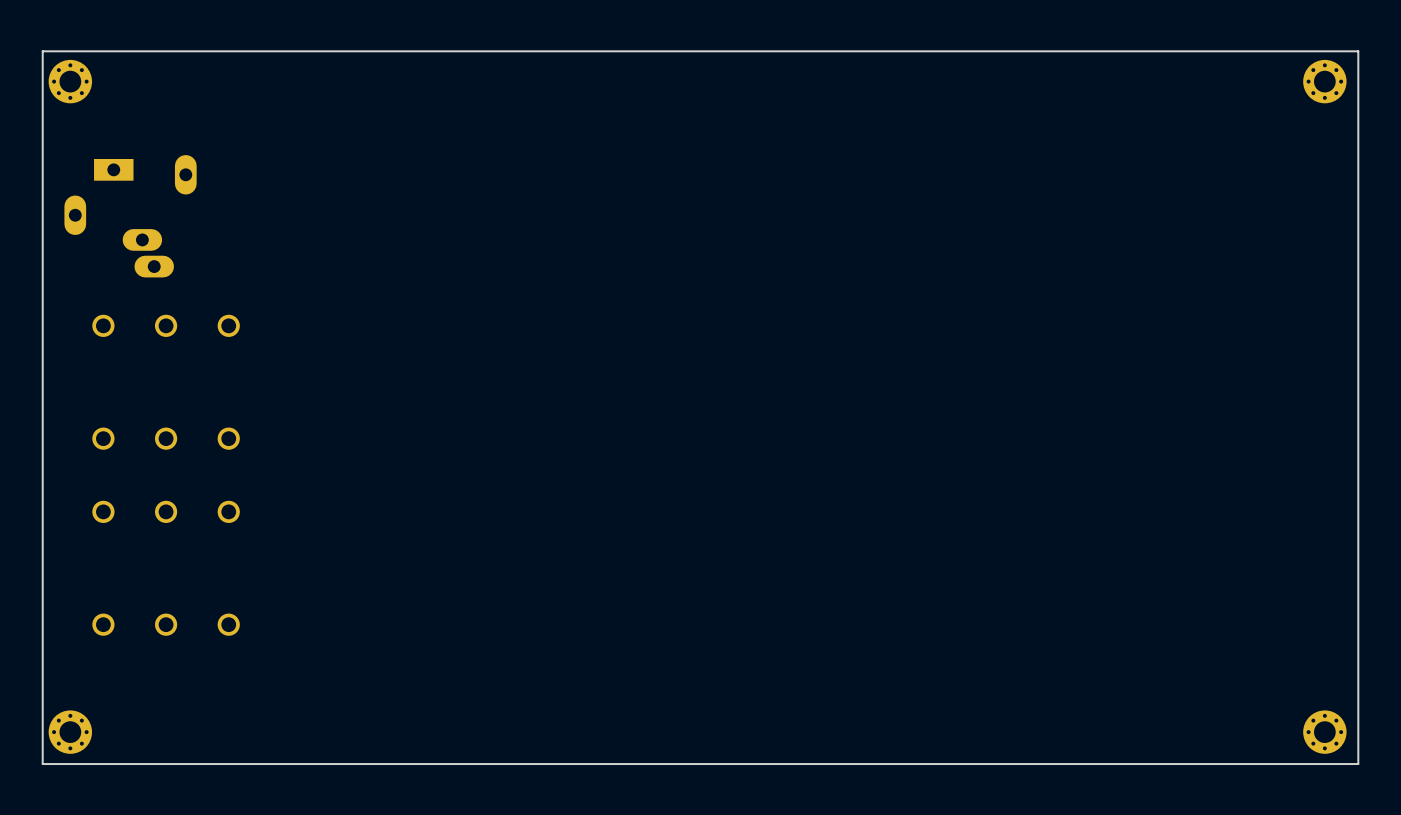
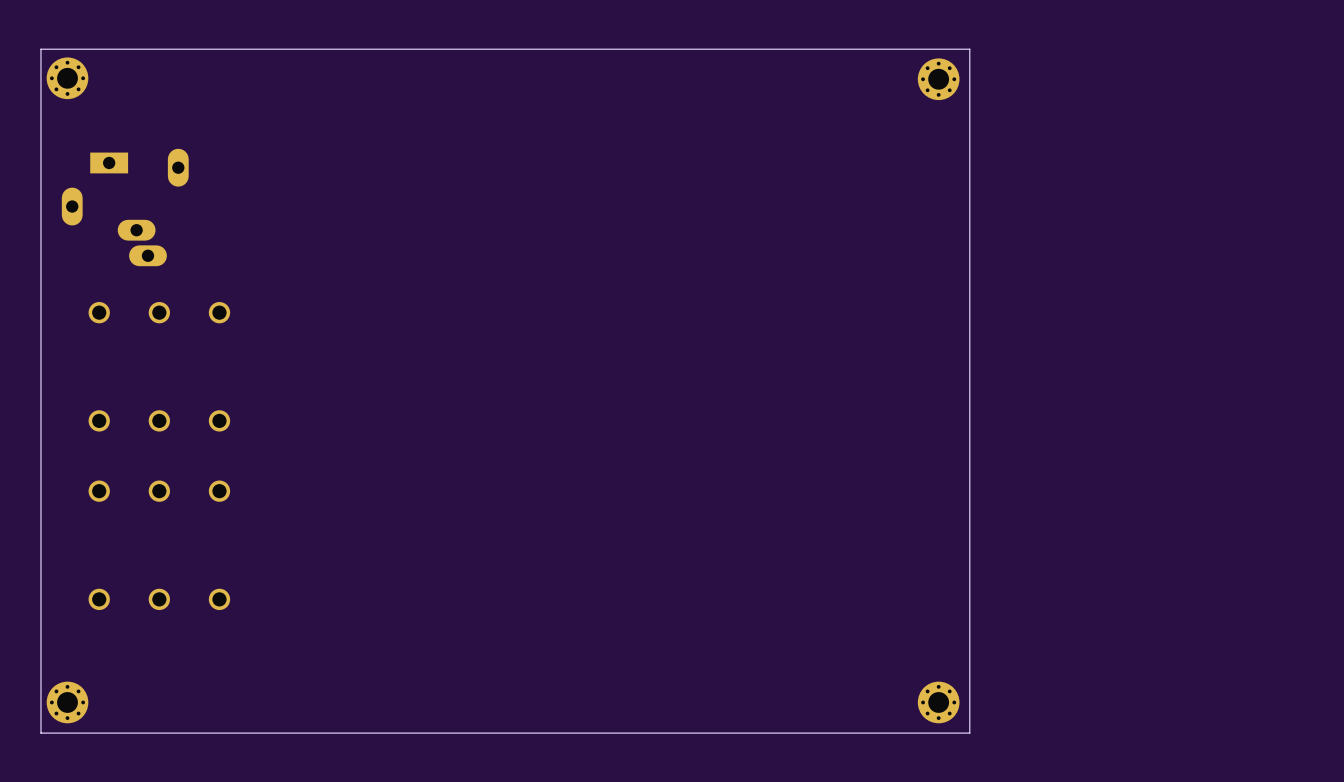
board edge: (1010, 51) (1358, 51) (1358, 764) (1010, 764) -> (969, 49) (969, 733)
part: (1324, 81) -> none
part: none -> (938, 79)
part: none -> (938, 702)
part: (1324, 732) -> none

